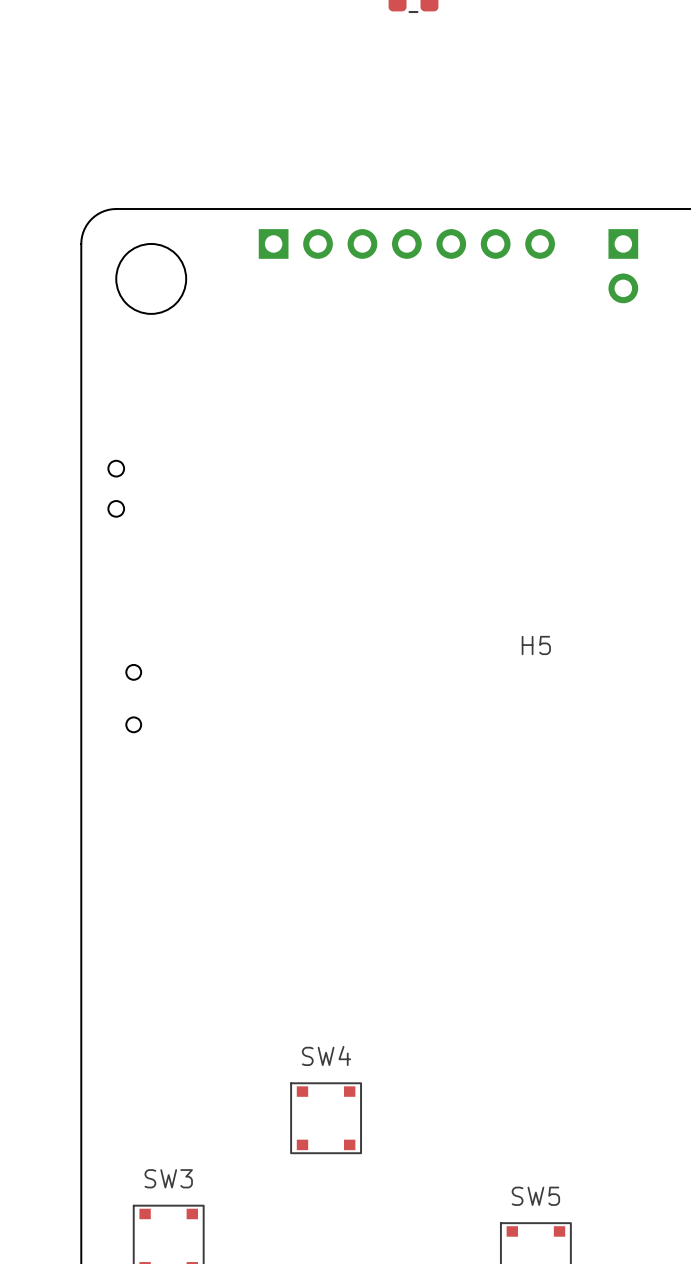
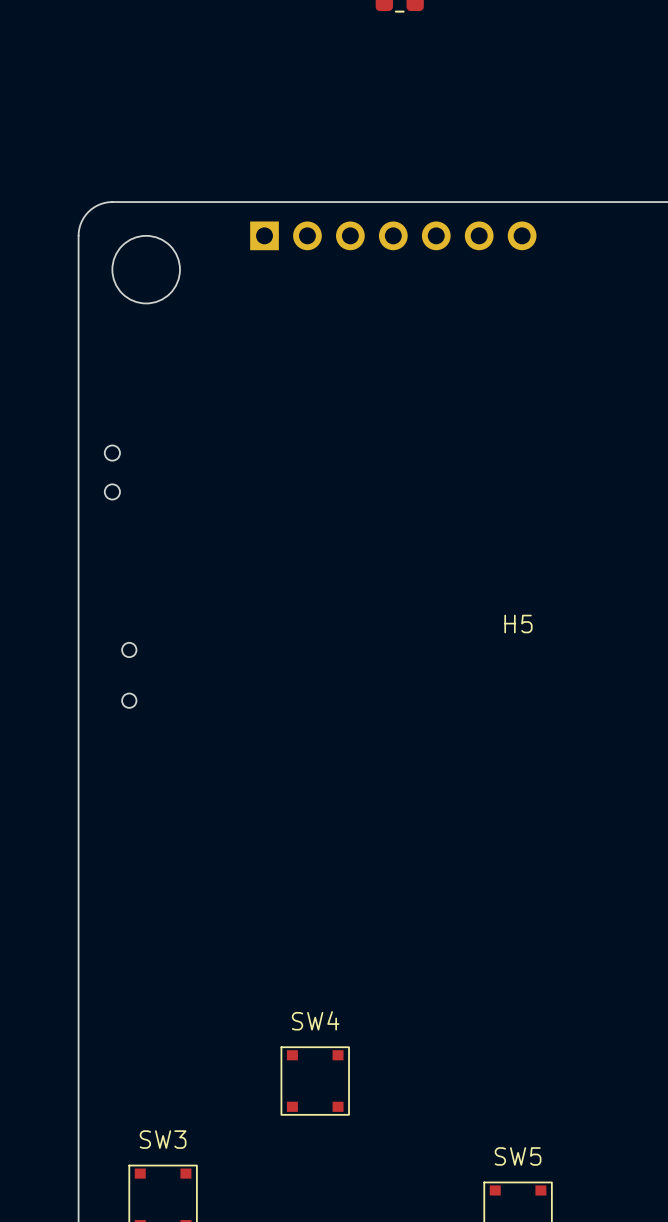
part: (623, 266) -> none

